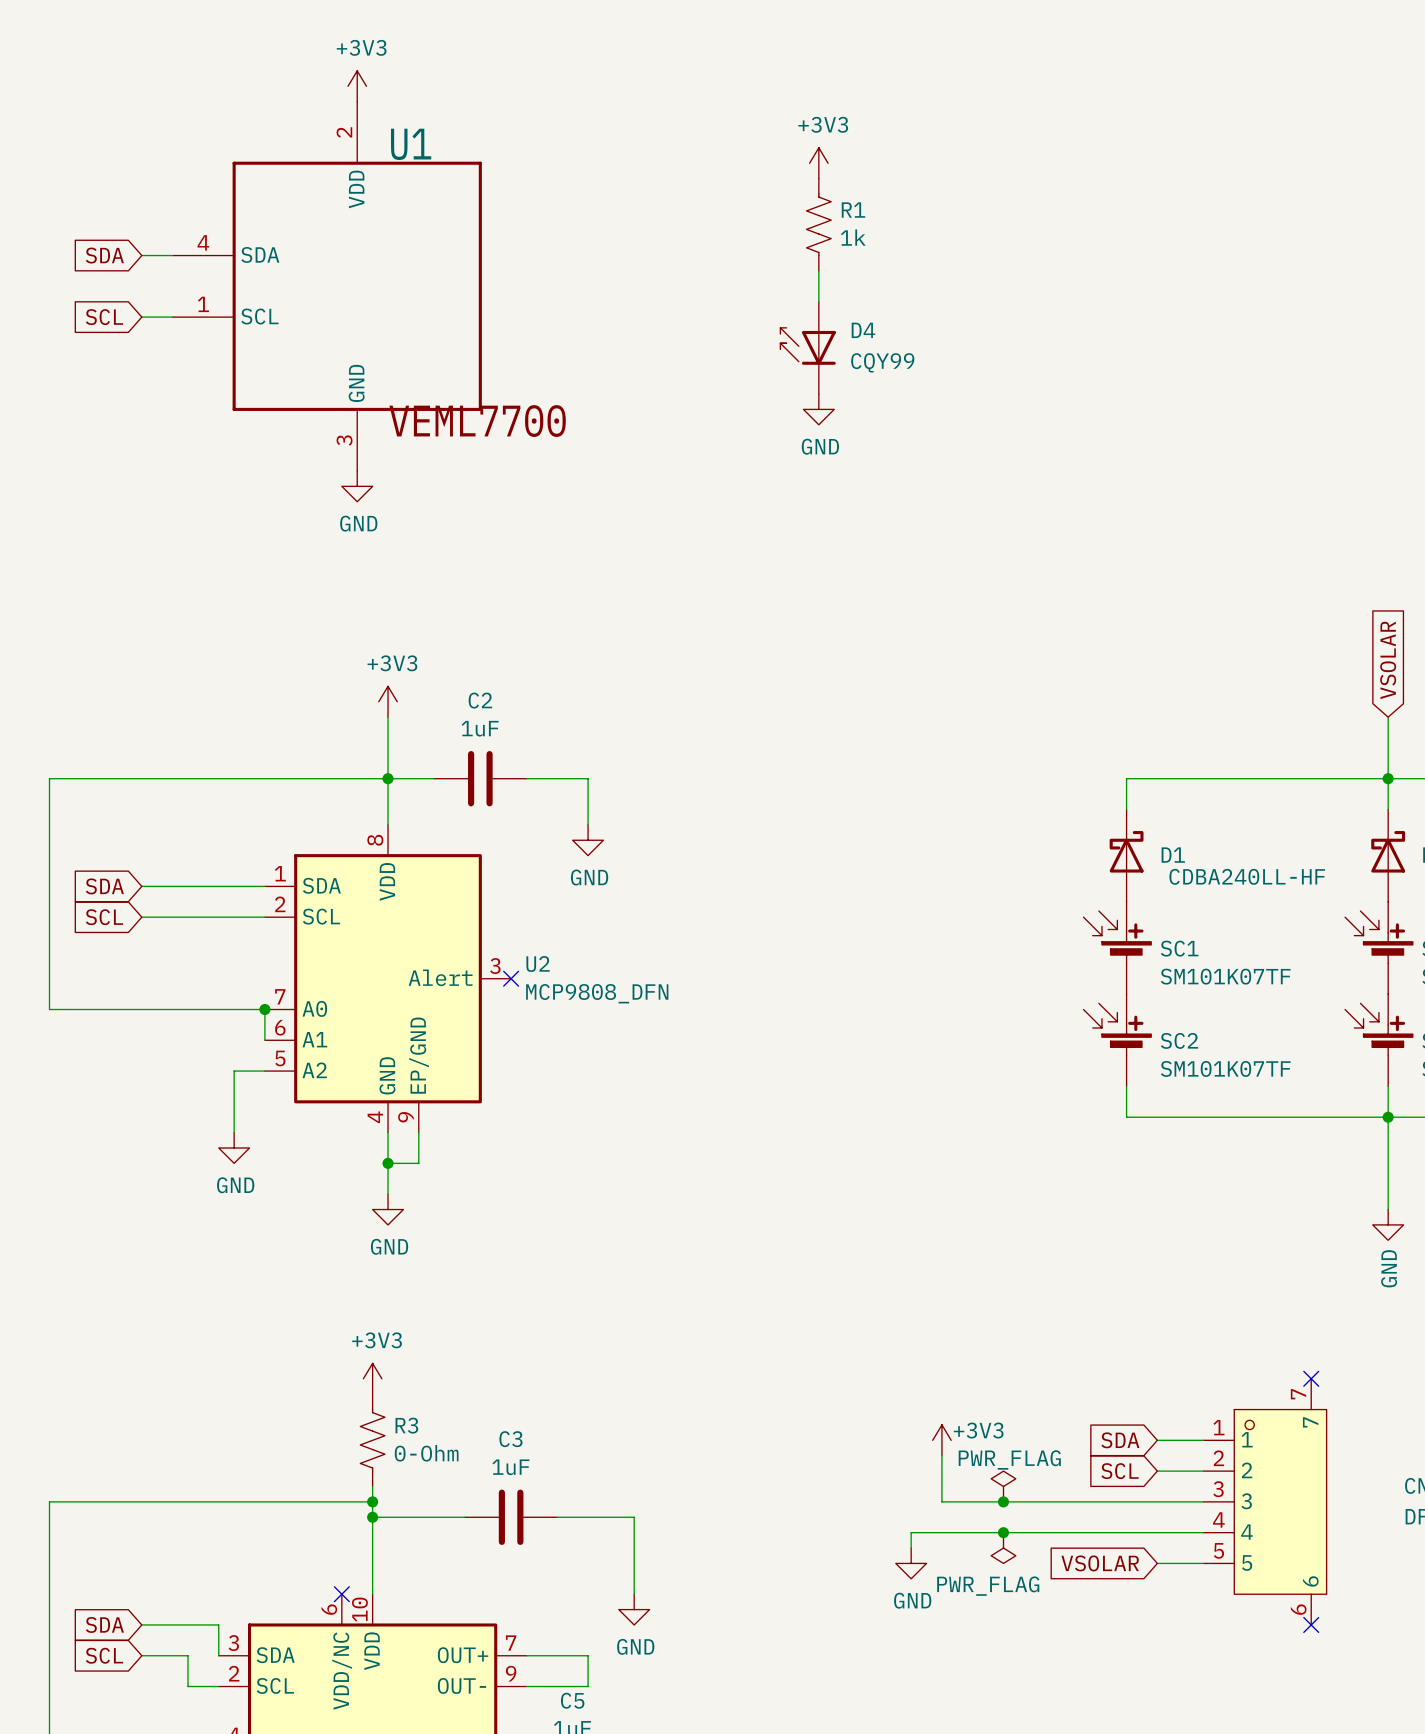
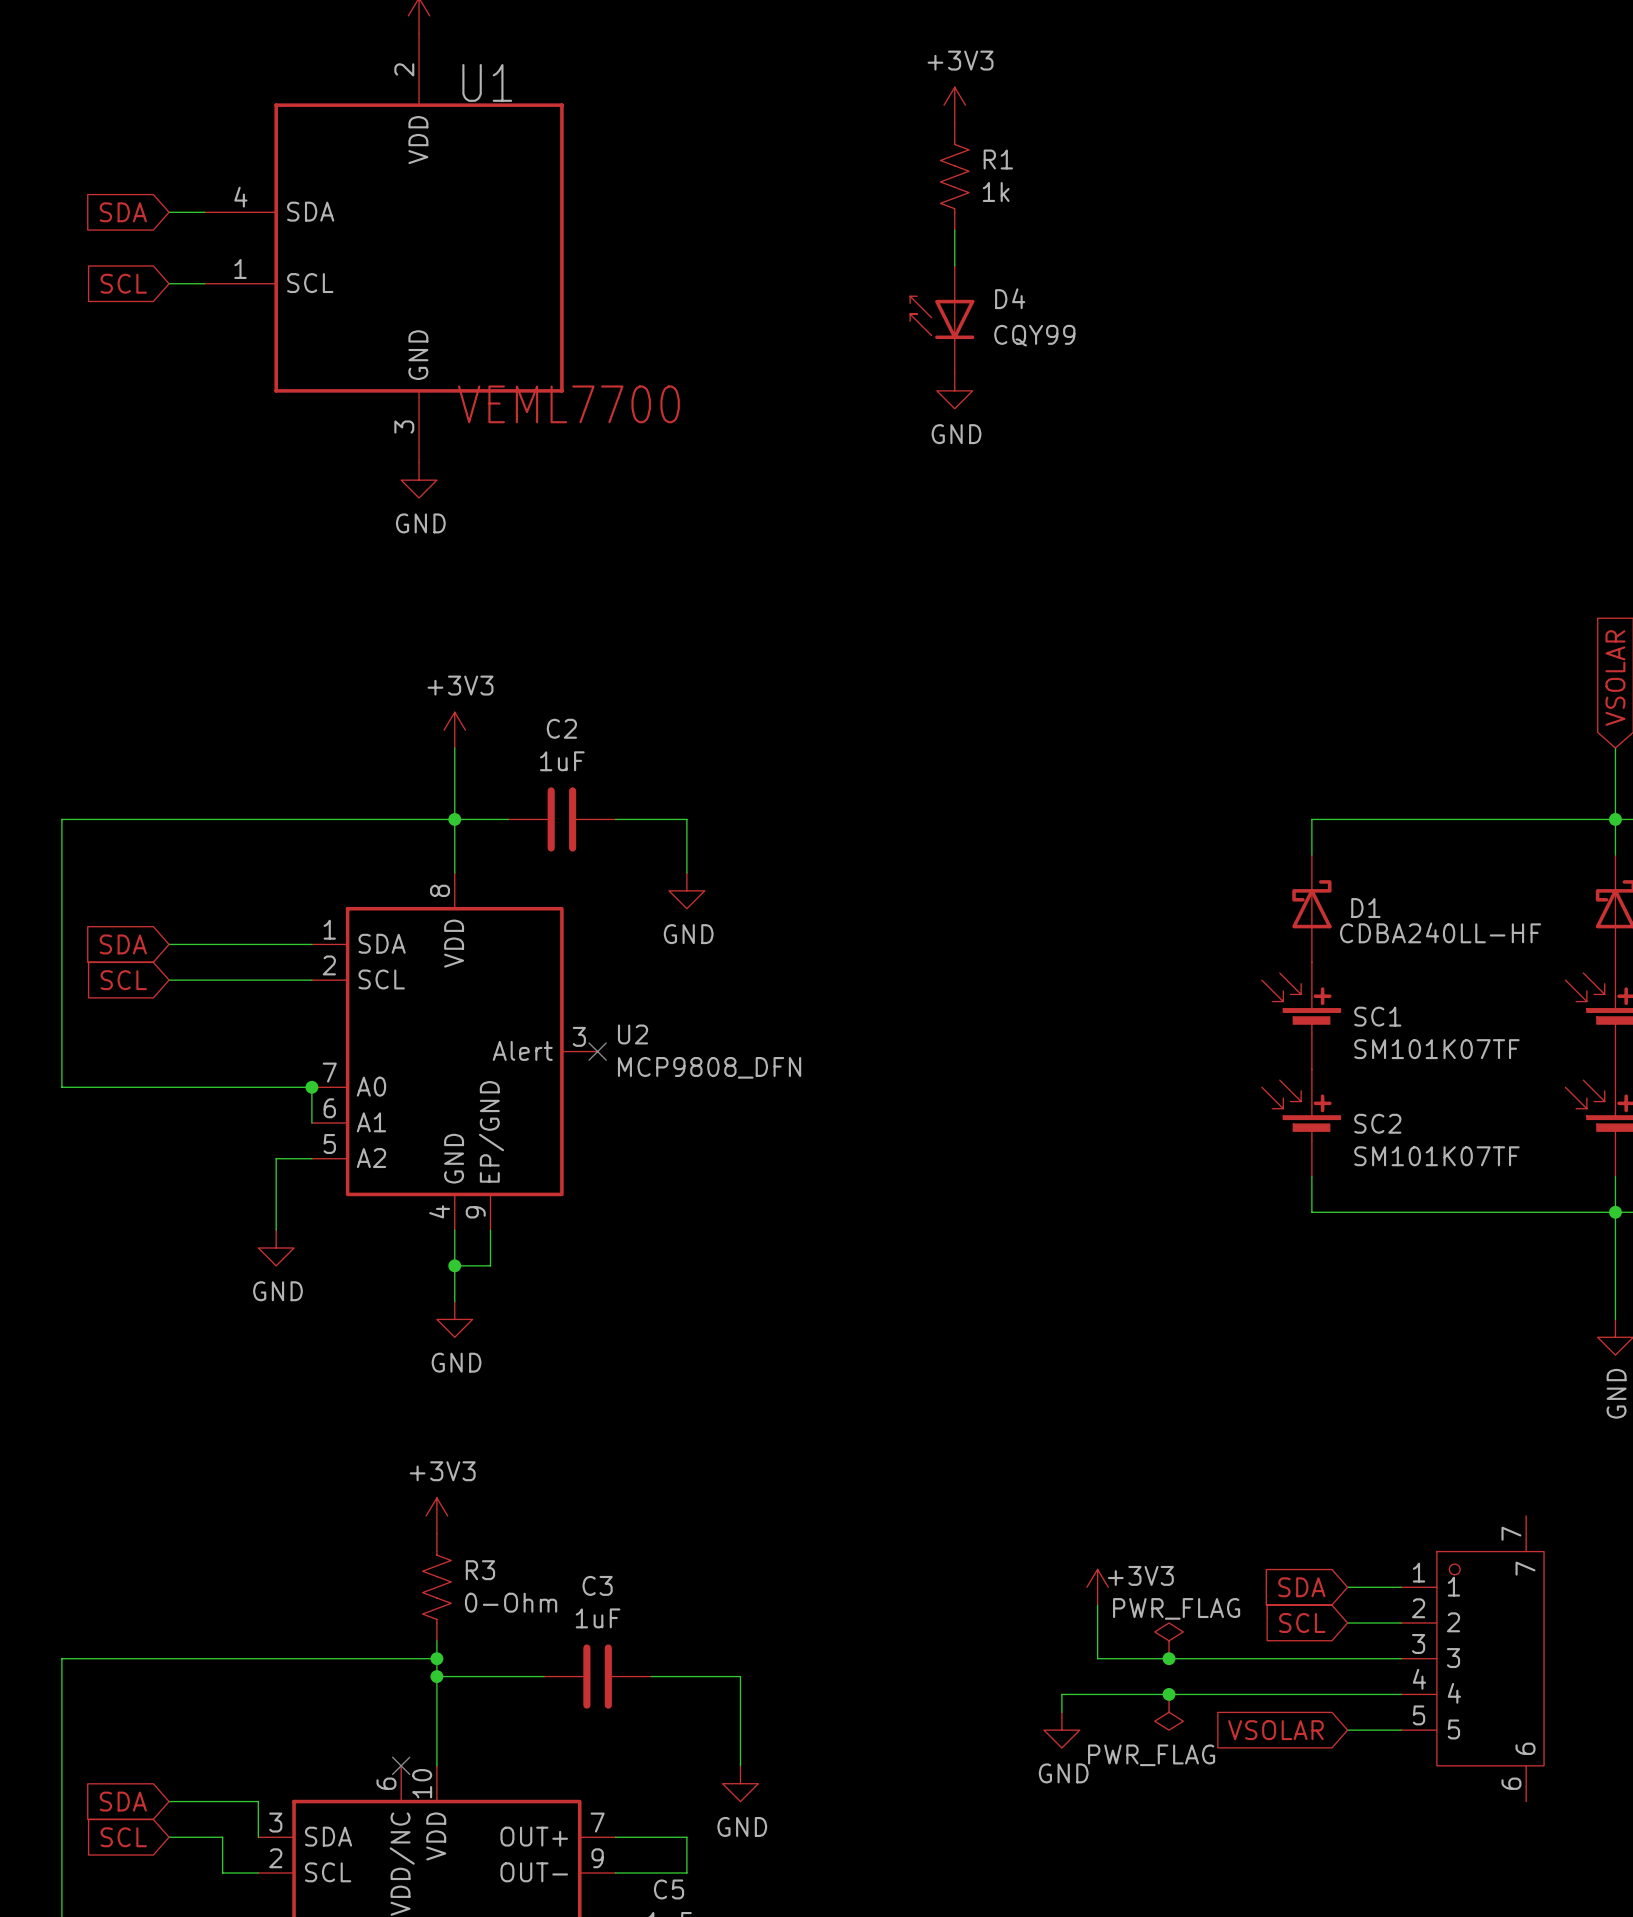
no-connect mark: (1311, 1378) -> none
no-connect mark: (1311, 1624) -> none

